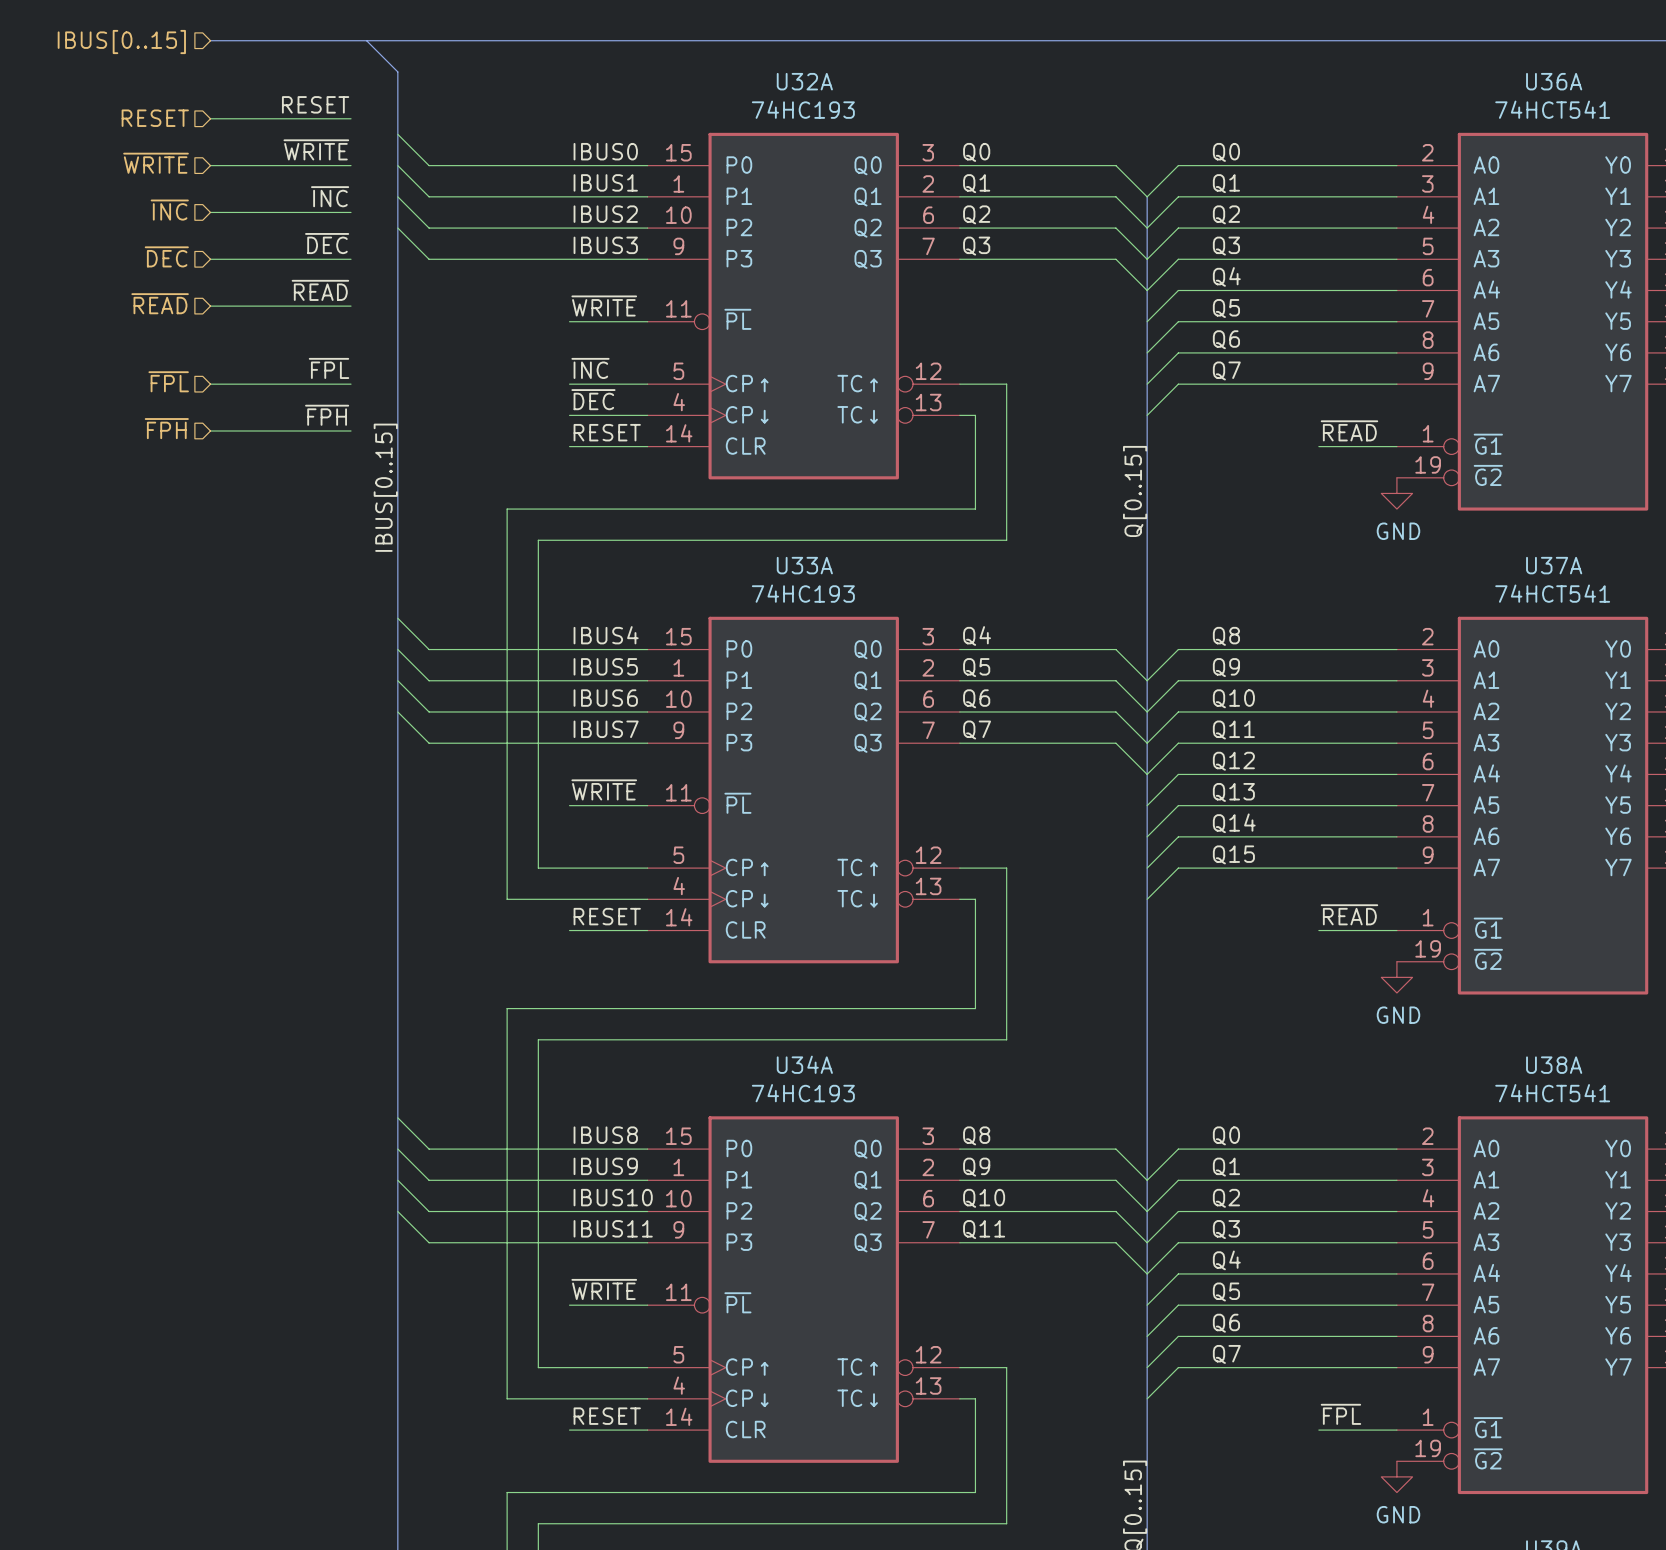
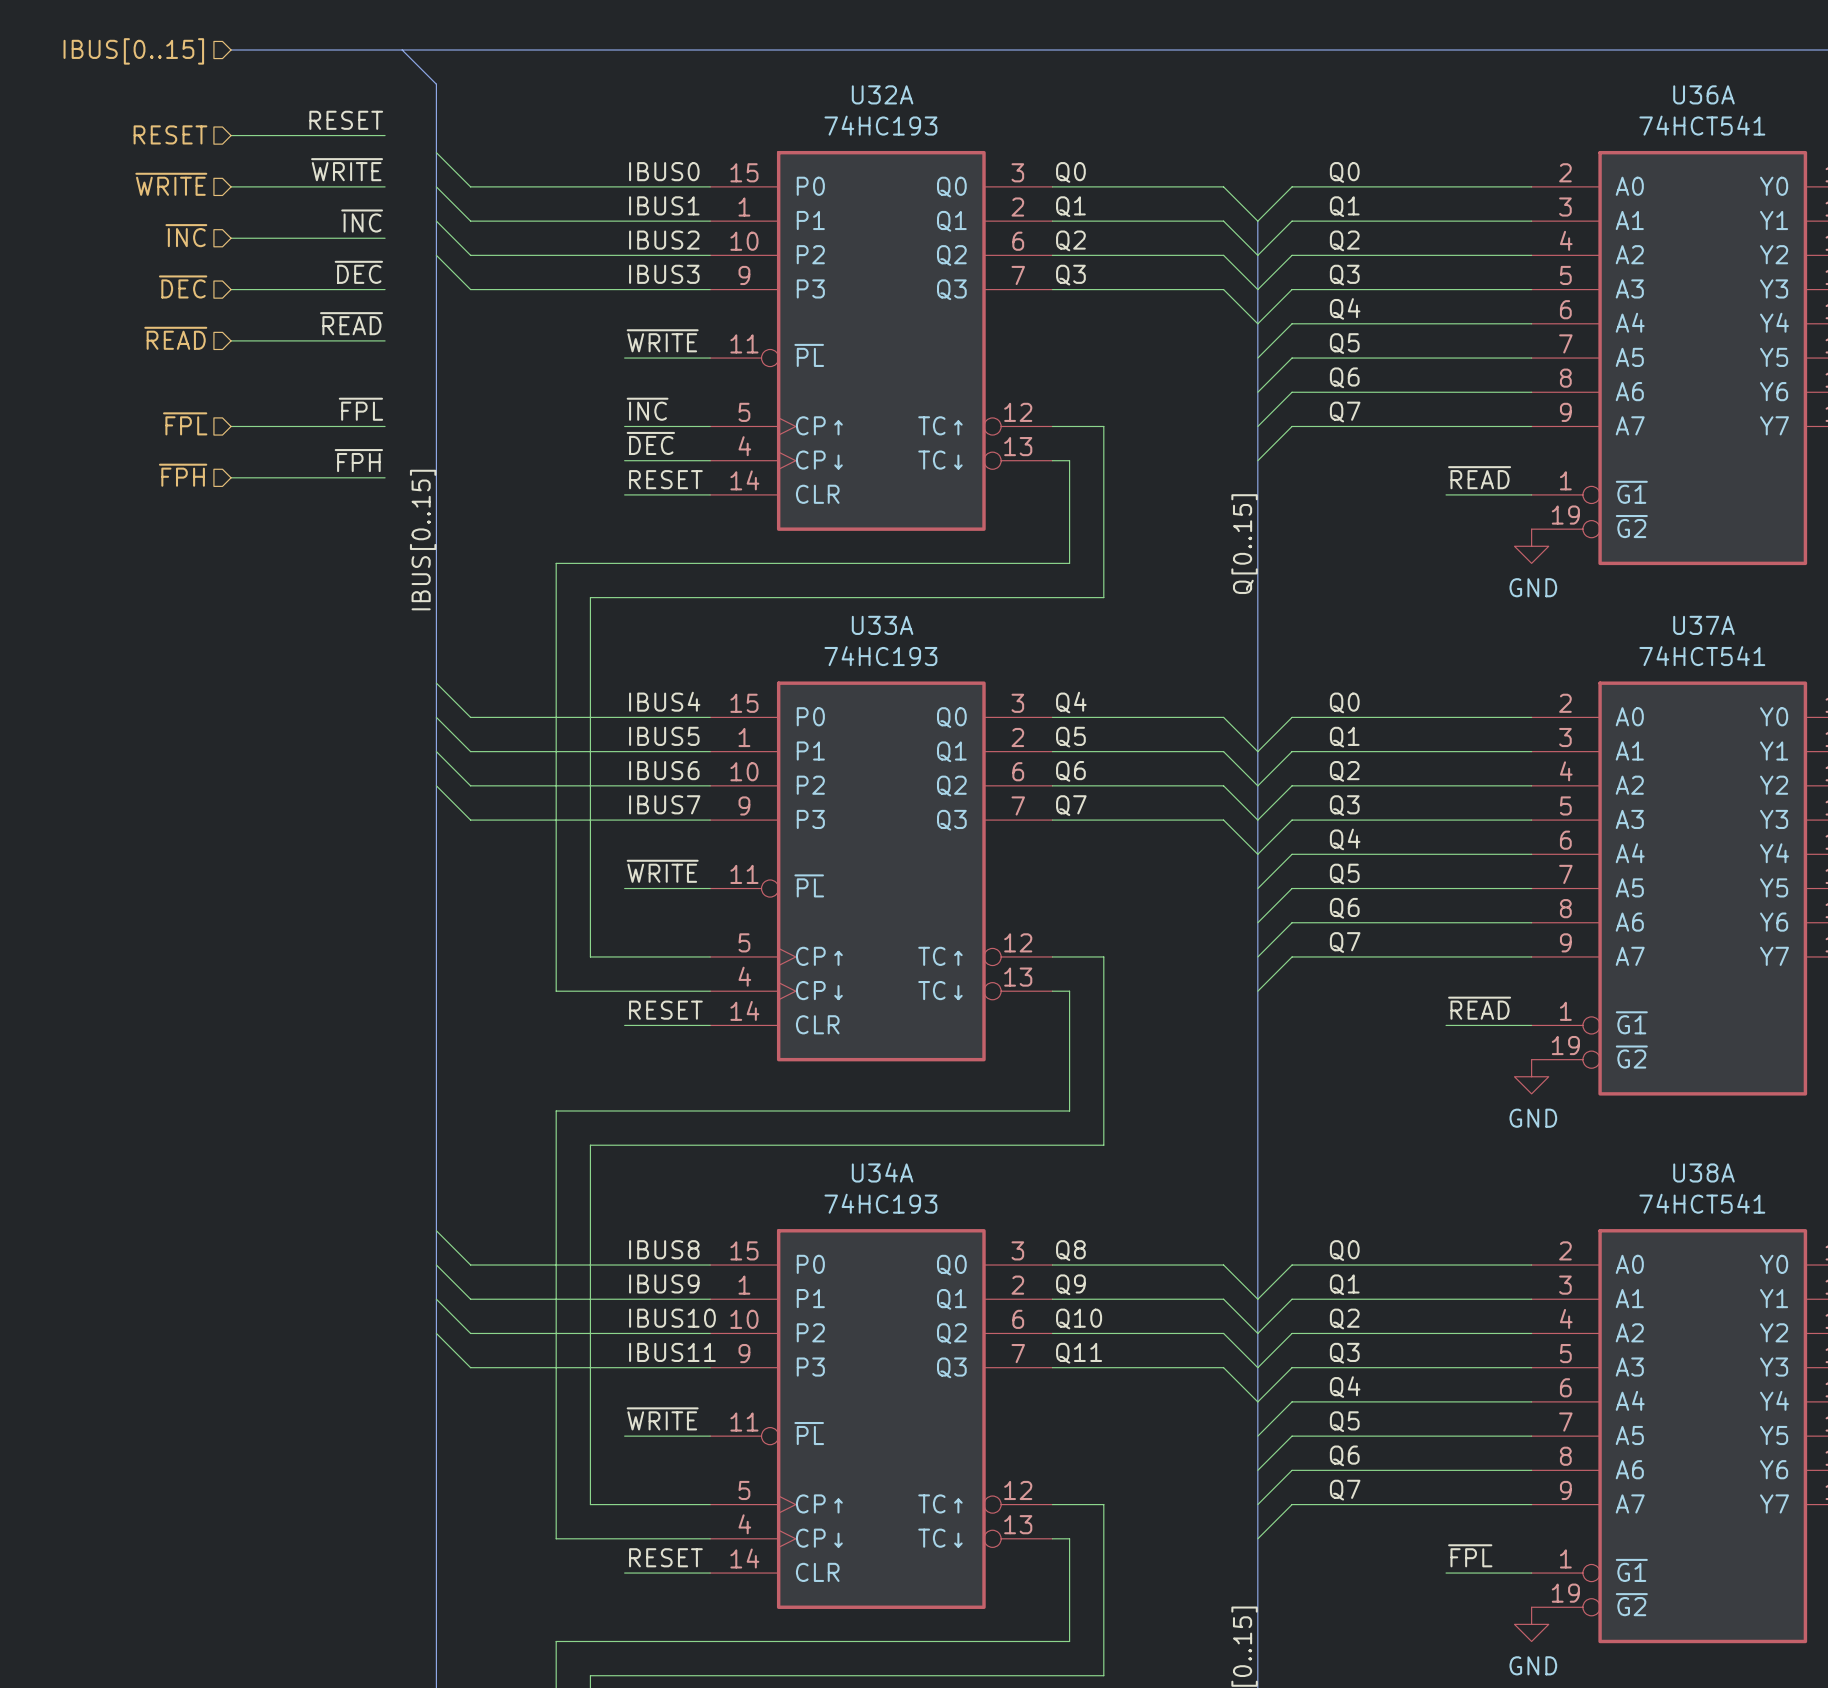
label: Q8 (1226, 636) -> Q0 (1344, 702)
label: Q9 (1226, 667) -> Q1 (1344, 737)
label: Q10 (1233, 698) -> Q2 (1344, 771)
label: Q11 (1233, 730) -> Q3 (1344, 805)
label: Q12 (1233, 761) -> Q4 (1345, 839)
label: Q13 (1233, 792) -> Q5 (1344, 874)
label: Q14 (1234, 823) -> Q6 (1344, 908)
label: Q15 (1233, 854) -> Q7 (1345, 942)

